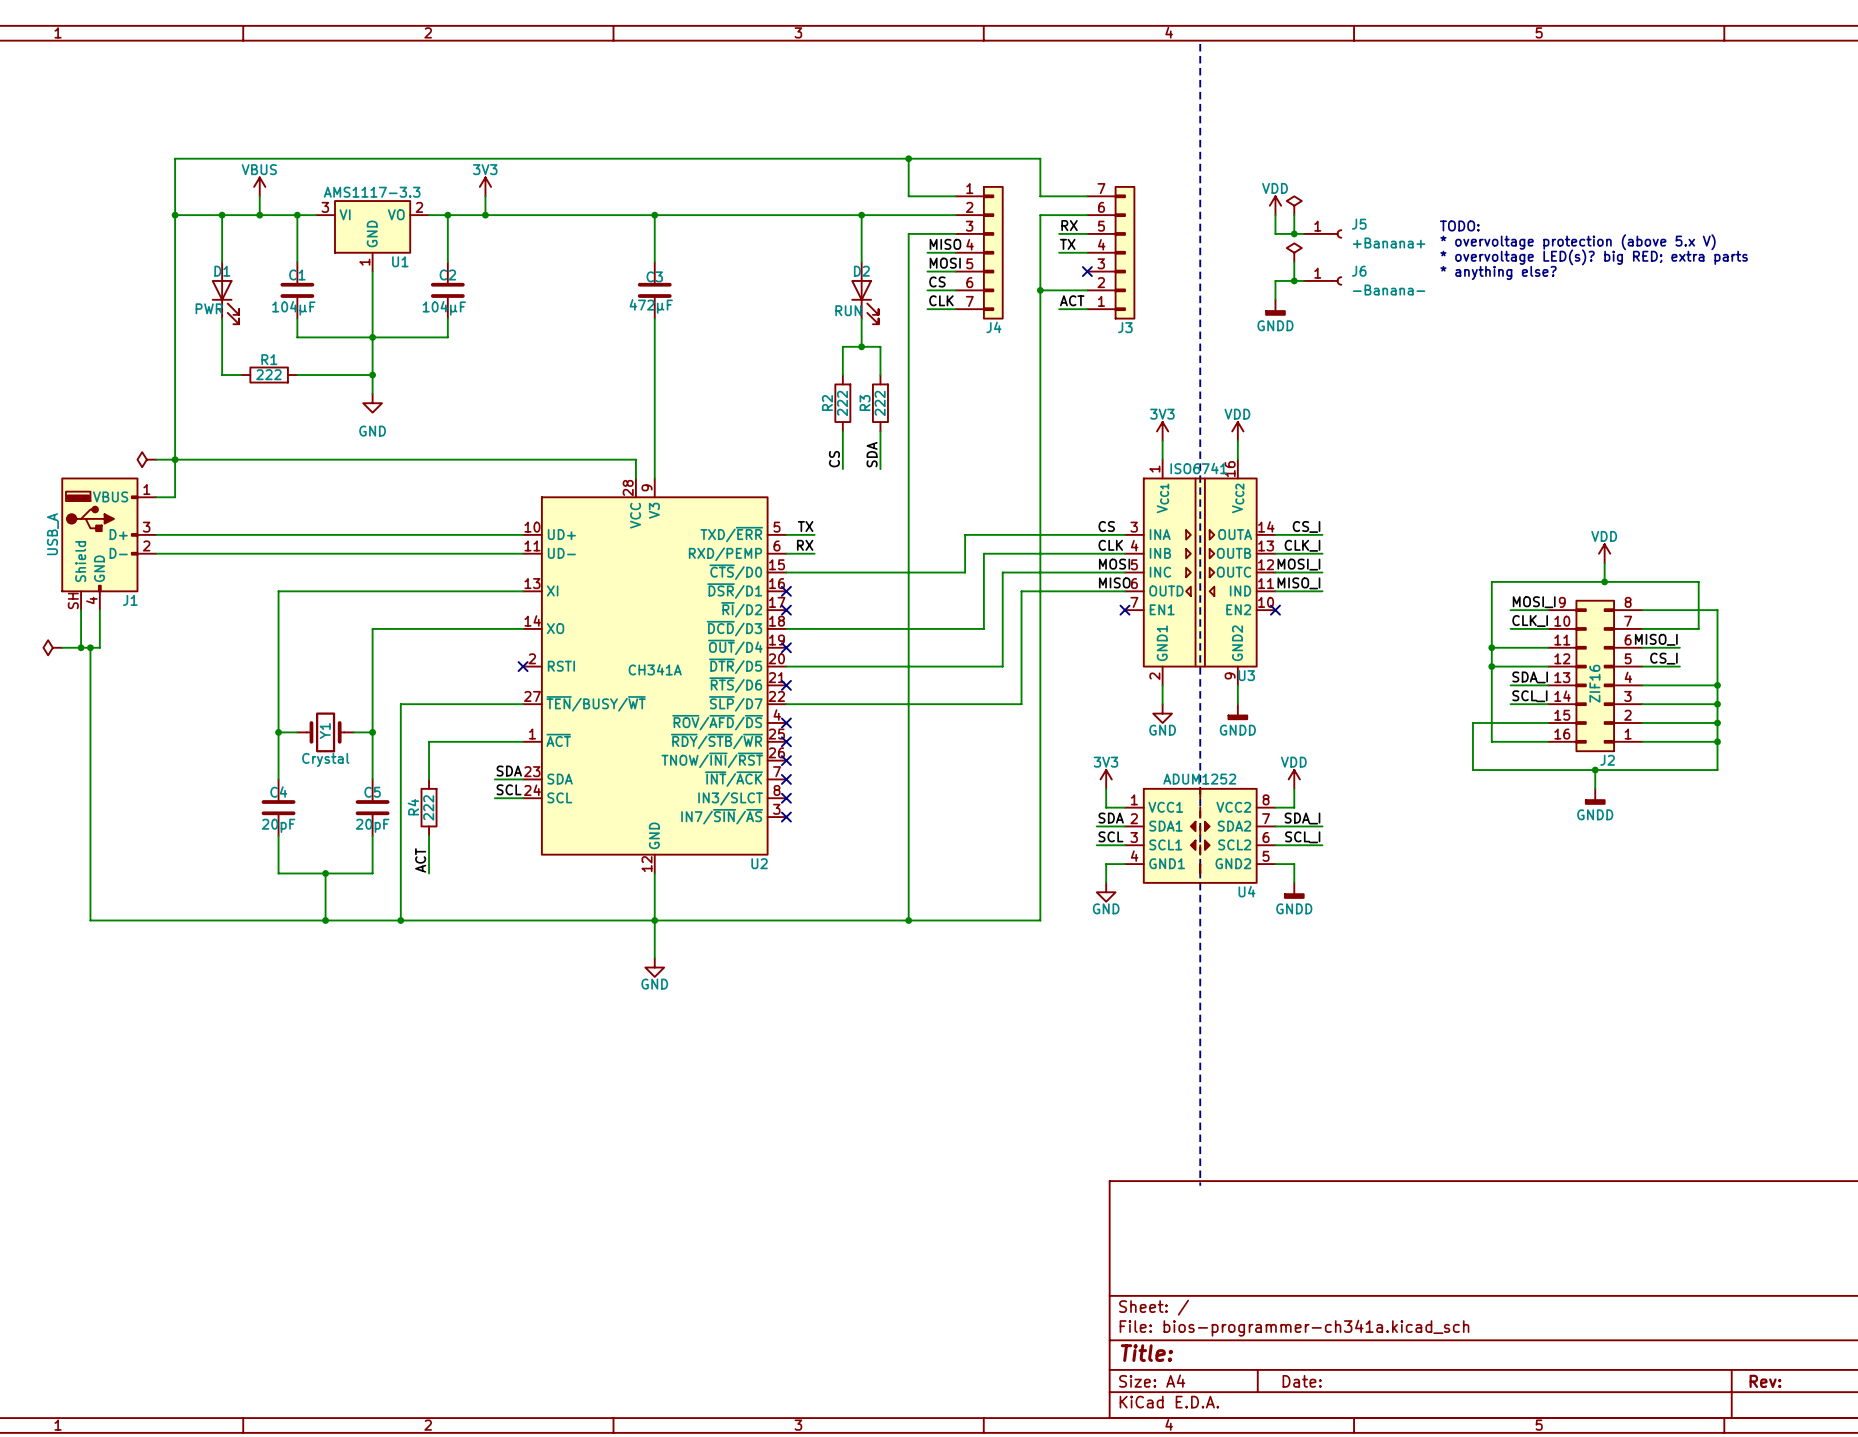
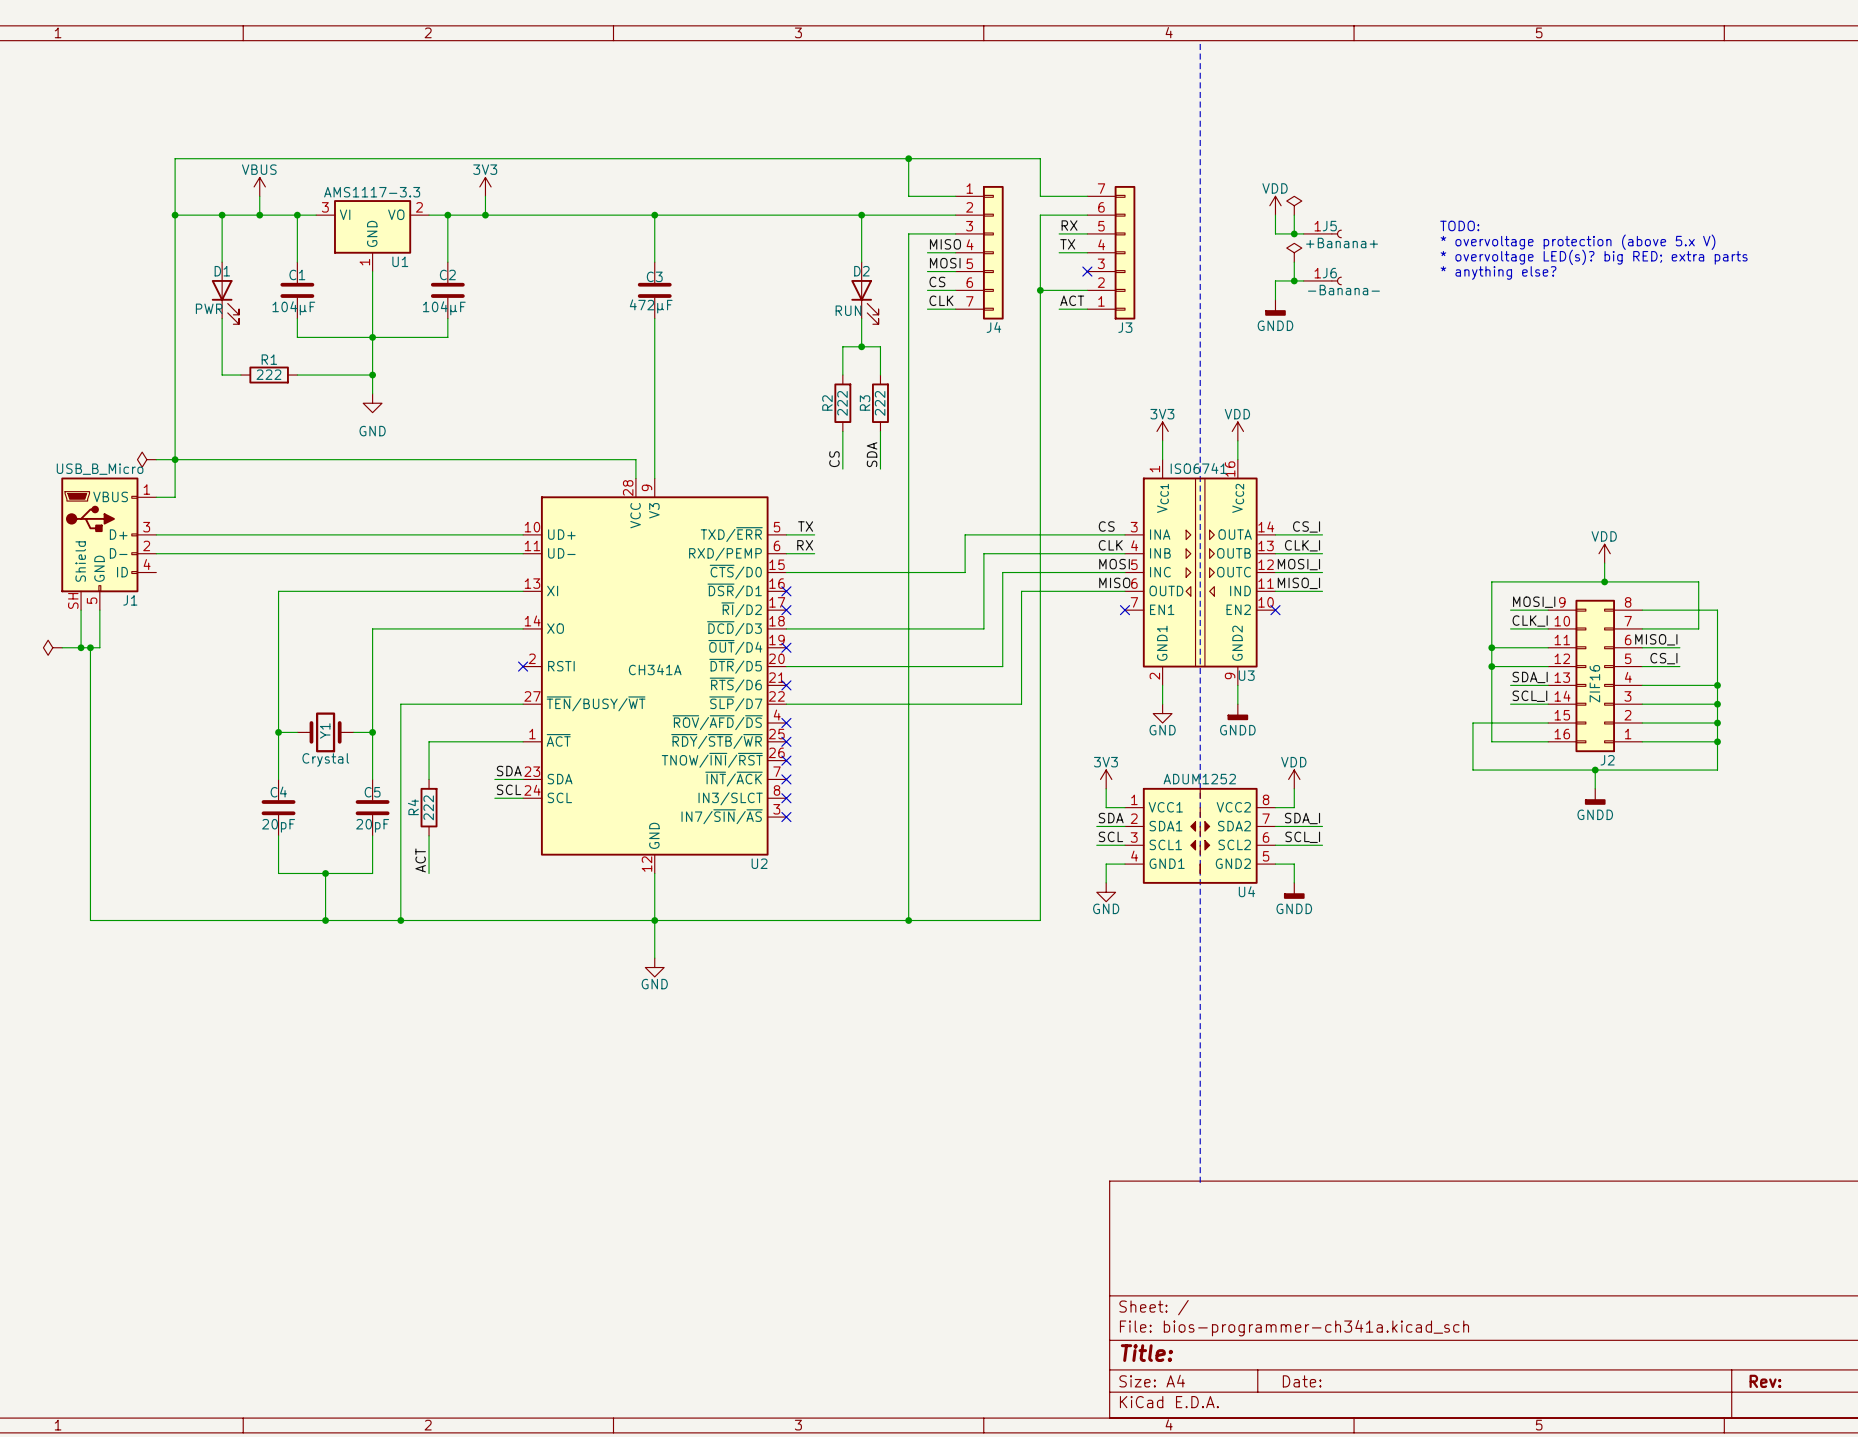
J5 name position: J5 (1359, 224) -> J5 (1329, 226)
J5 value position: +Banana+ (1389, 243) -> +Banana+ (1342, 243)
J6 name position: J6 (1359, 271) -> J6 (1329, 273)
J6 value position: -Banana- (1389, 290) -> -Banana- (1343, 290)
J1 symbol: [61, 477, 157, 611] -> [61, 477, 157, 611]
J1 value: USB_A (52, 534) -> USB_B_Micro (100, 469)

